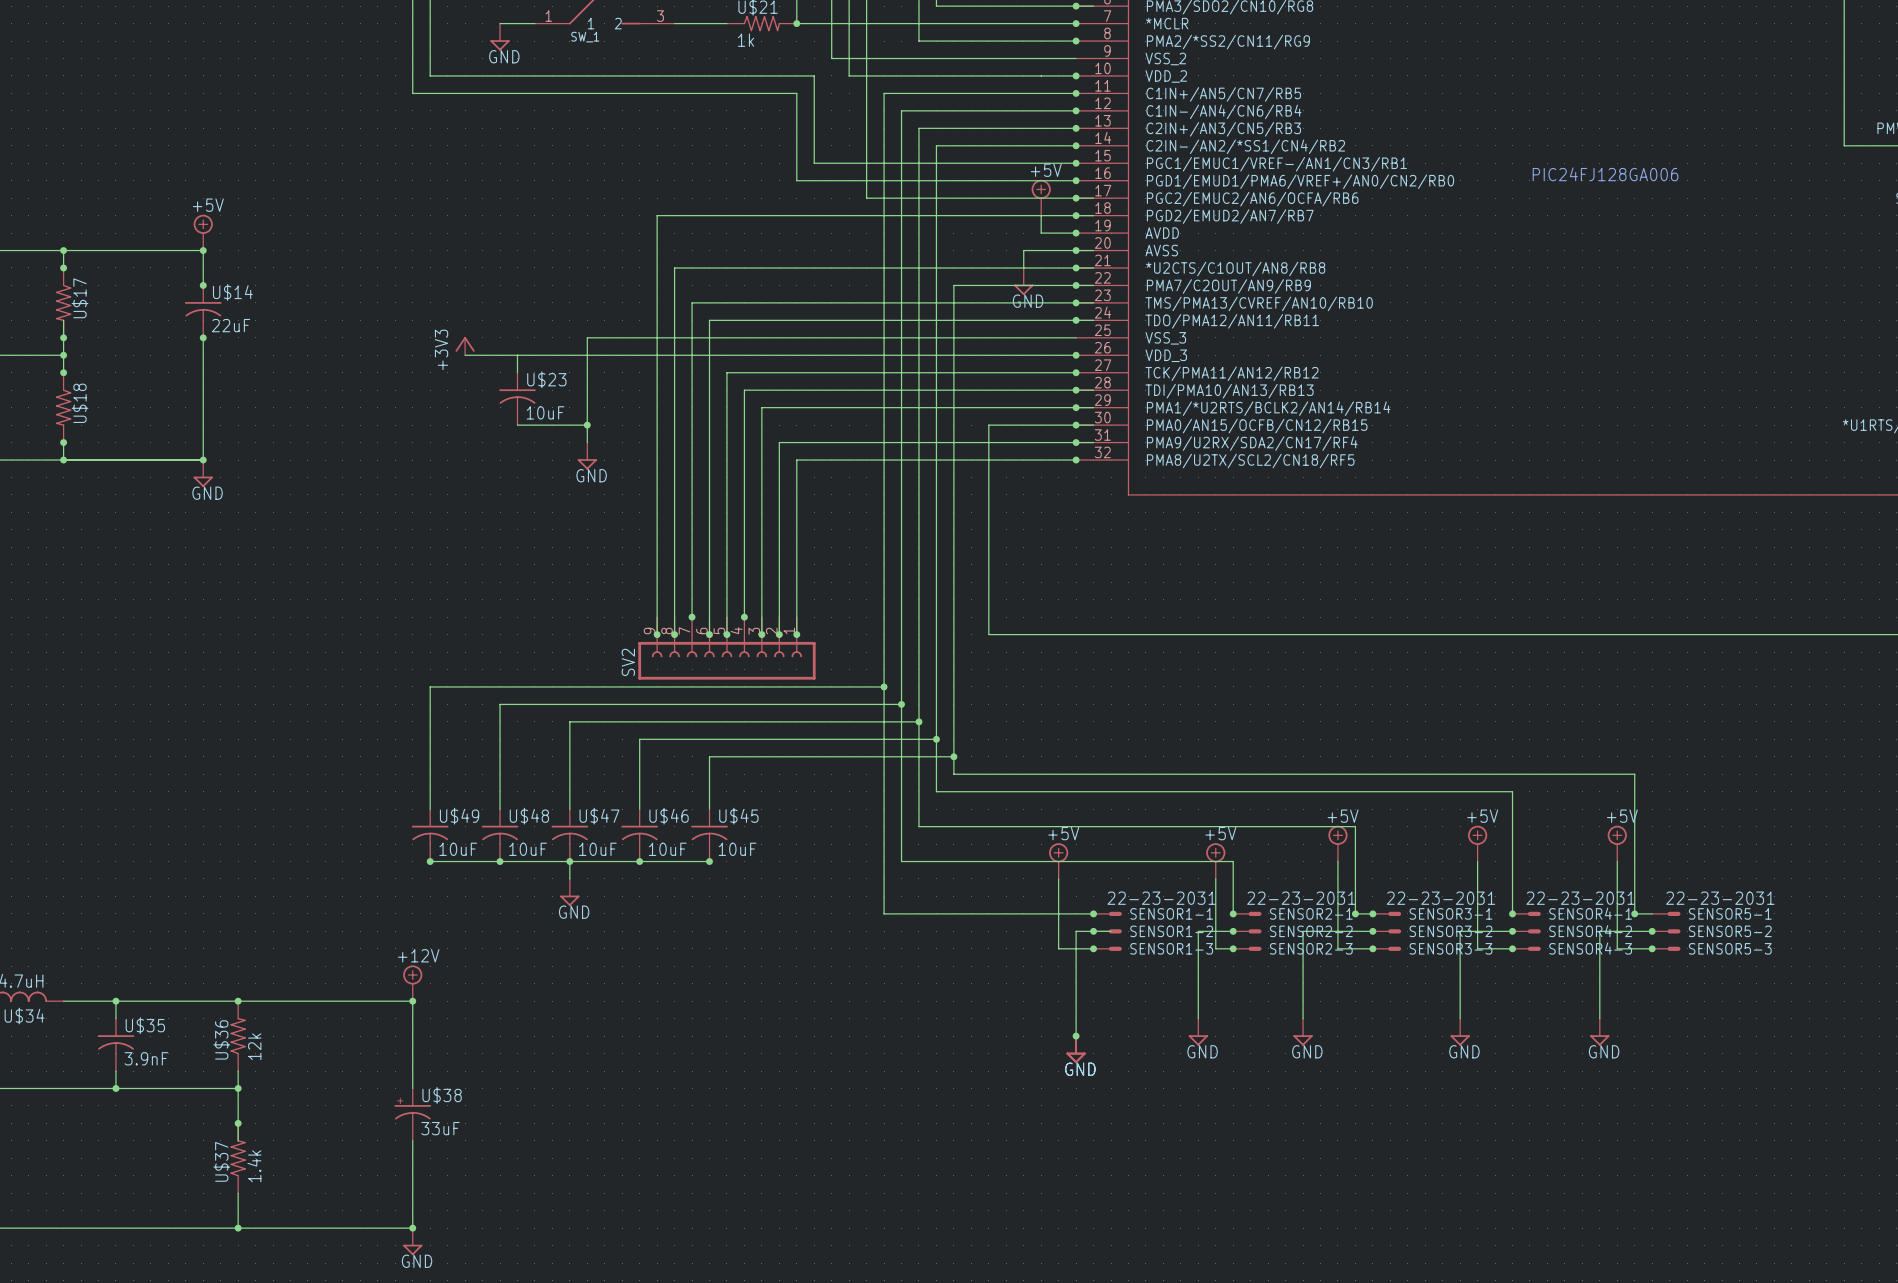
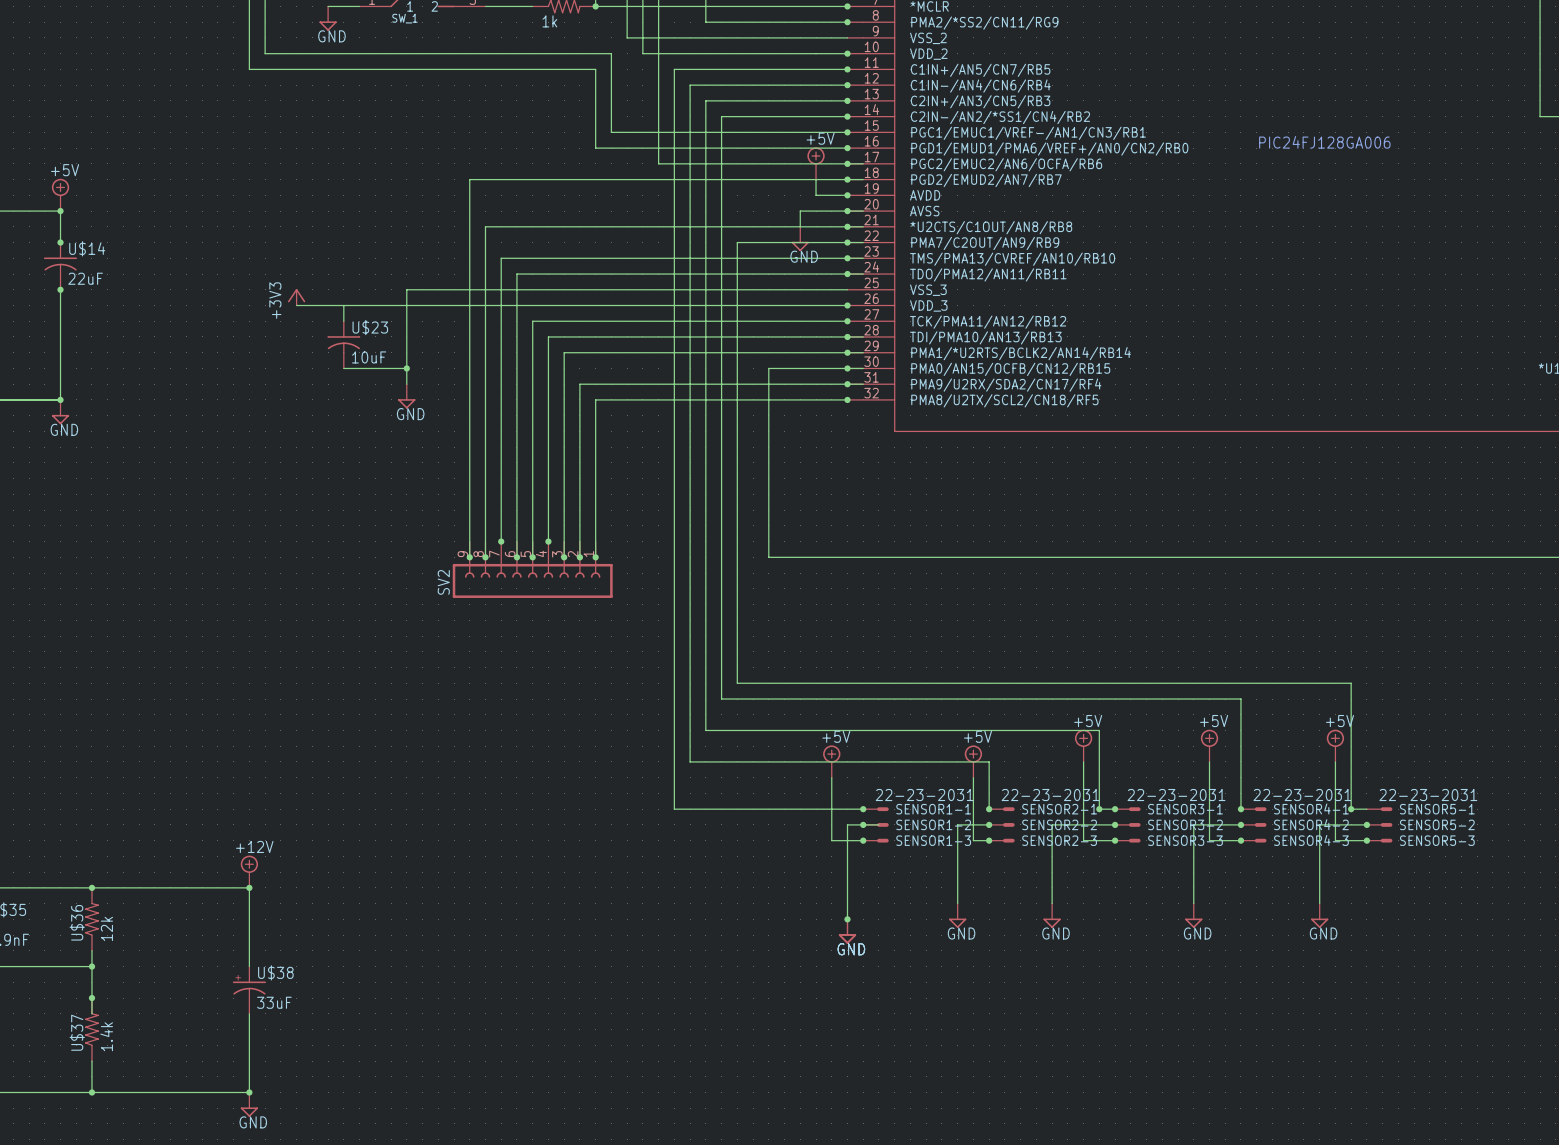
wire: (884, 686) (430, 686) (430, 809) -> none
junction: (884, 686) -> none
wire: (901, 704) (500, 704) (500, 809) -> none
junction: (901, 704) -> none
wire: (918, 721) (569, 721) (569, 809) -> none
junction: (918, 721) -> none
wire: (936, 739) (639, 739) (639, 809) -> none
junction: (936, 739) -> none
wire: (953, 756) (709, 756) (709, 809) -> none
junction: (953, 756) -> none
U$49: 10uF (430, 835) -> none
U$48: 10uF (500, 835) -> none
U$47: 10uF (569, 835) -> none
U$46: 10uF (639, 835) -> none
U$45: 10uF (709, 835) -> none
wire: (430, 861) (709, 861) -> none
junction: (430, 861) -> none
junction: (500, 861) -> none
wire: (569, 861) (569, 878) -> none
junction: (569, 861) -> none
junction: (639, 861) -> none
junction: (709, 861) -> none
power symbol: GND (569, 892) -> none

